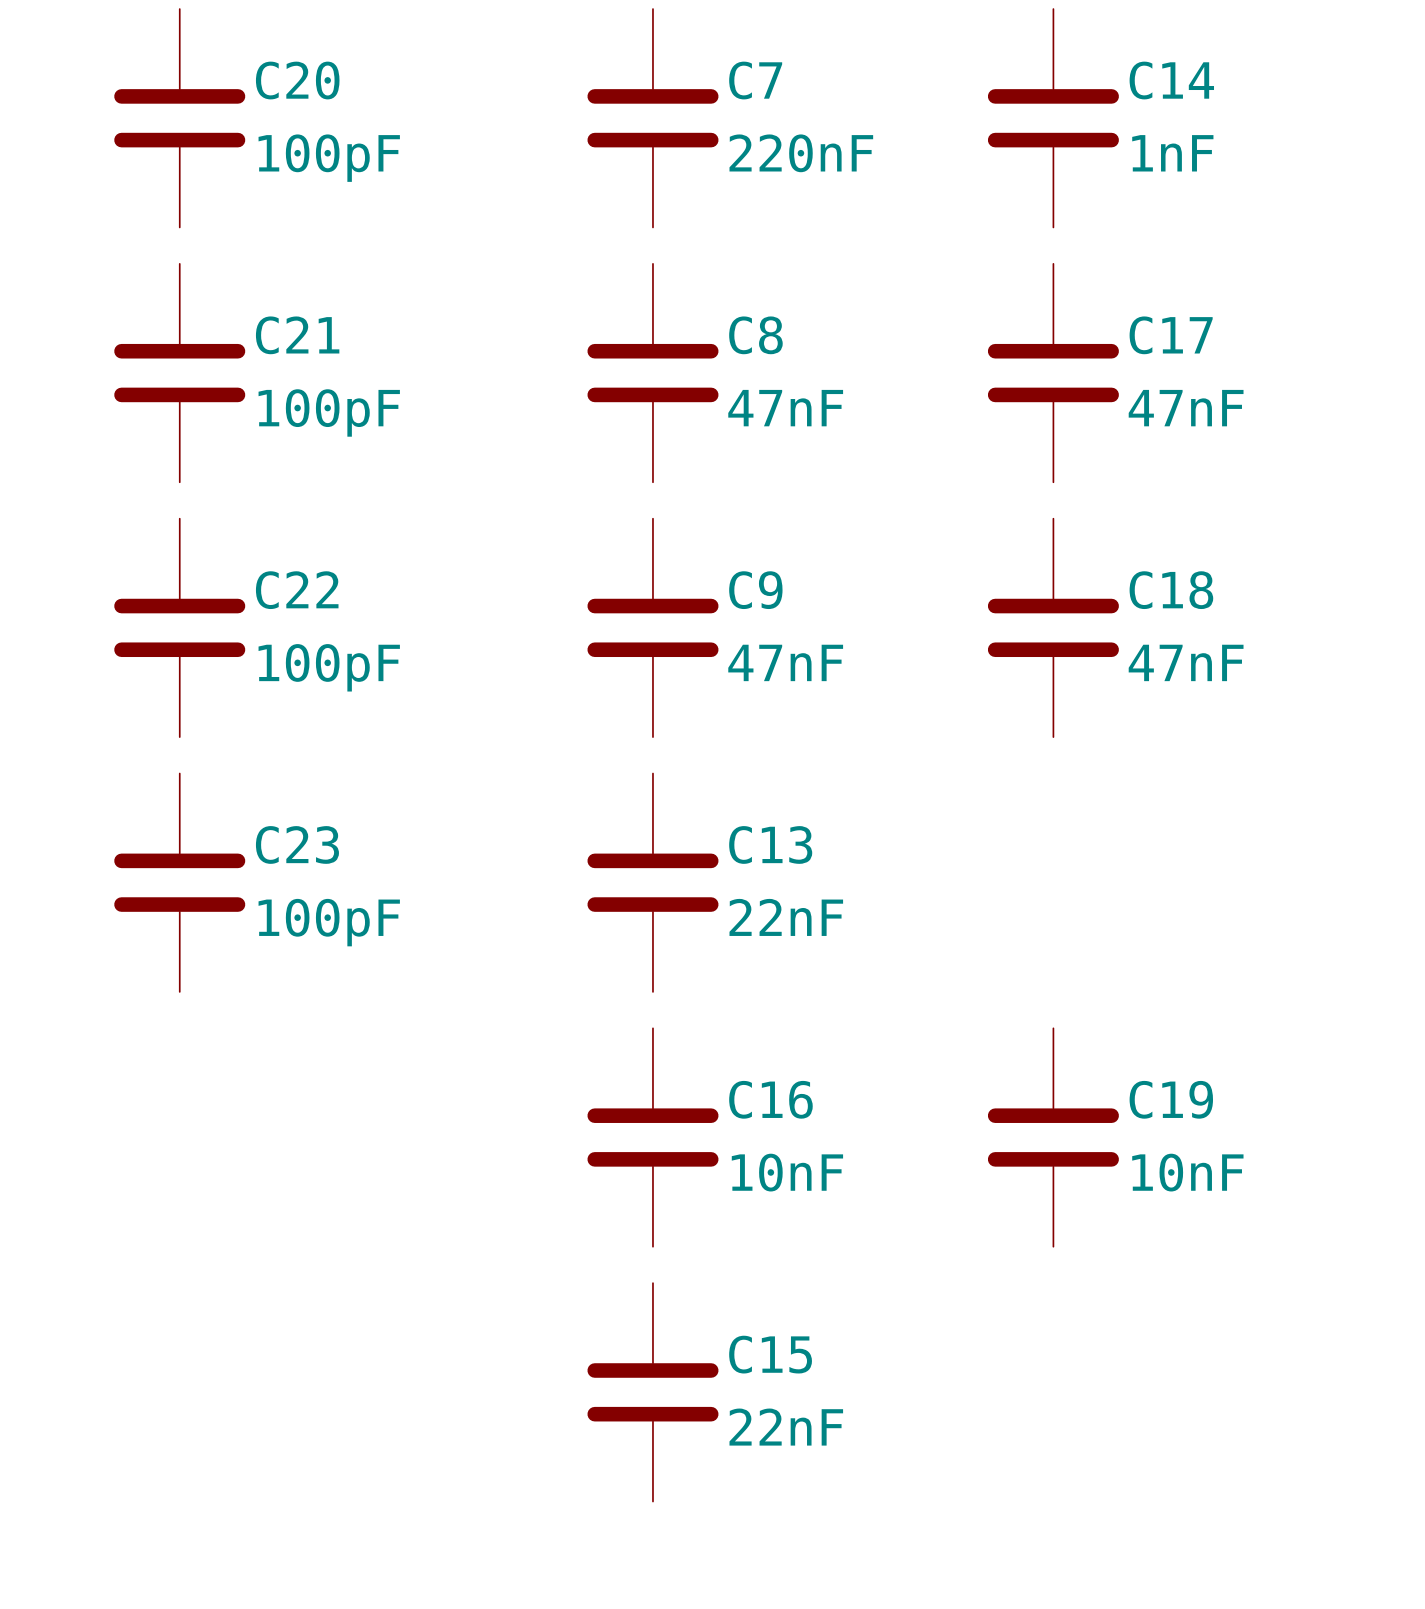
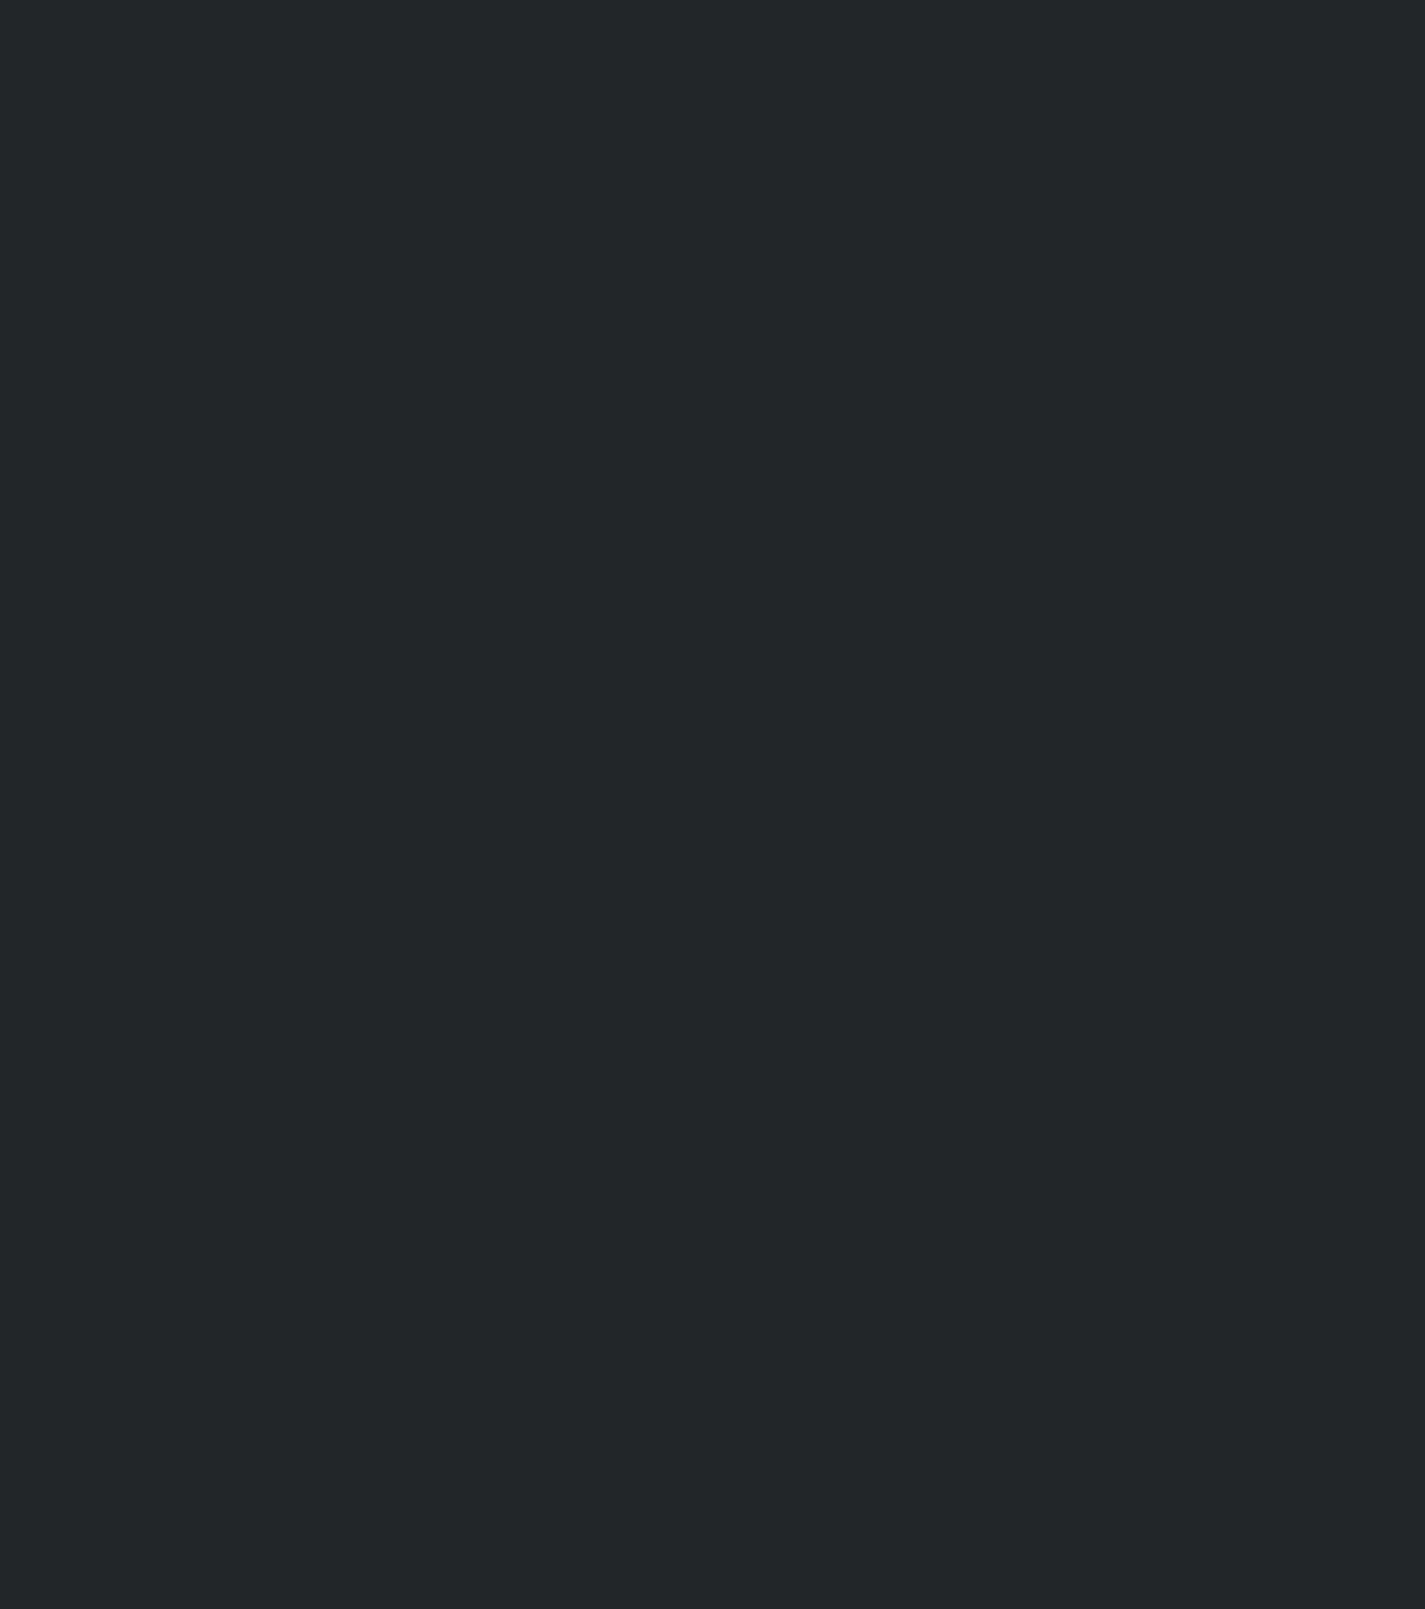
C20: 100pF (179, 118) -> none
C7: 220nF (652, 118) -> none
C14: 1nF (1053, 118) -> none
C21: 100pF (179, 373) -> none
C8: 47nF (652, 373) -> none
C17: 47nF (1053, 373) -> none
C22: 100pF (179, 627) -> none
C9: 47nF (652, 627) -> none
C18: 47nF (1053, 627) -> none
C23: 100pF (179, 882) -> none
C13: 22nF (652, 882) -> none
C16: 10nF (652, 1137) -> none
C19: 10nF (1053, 1137) -> none
C15: 22nF (652, 1392) -> none

